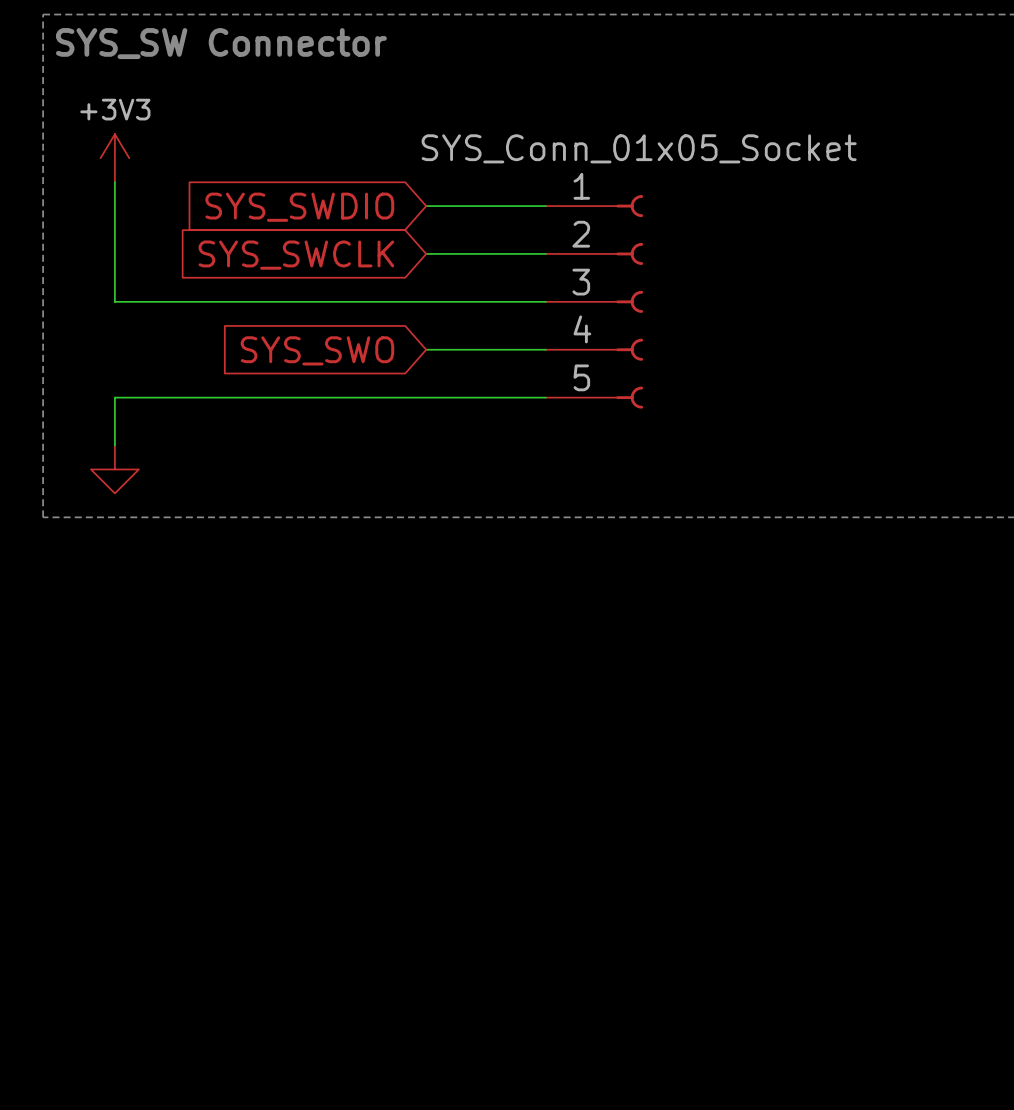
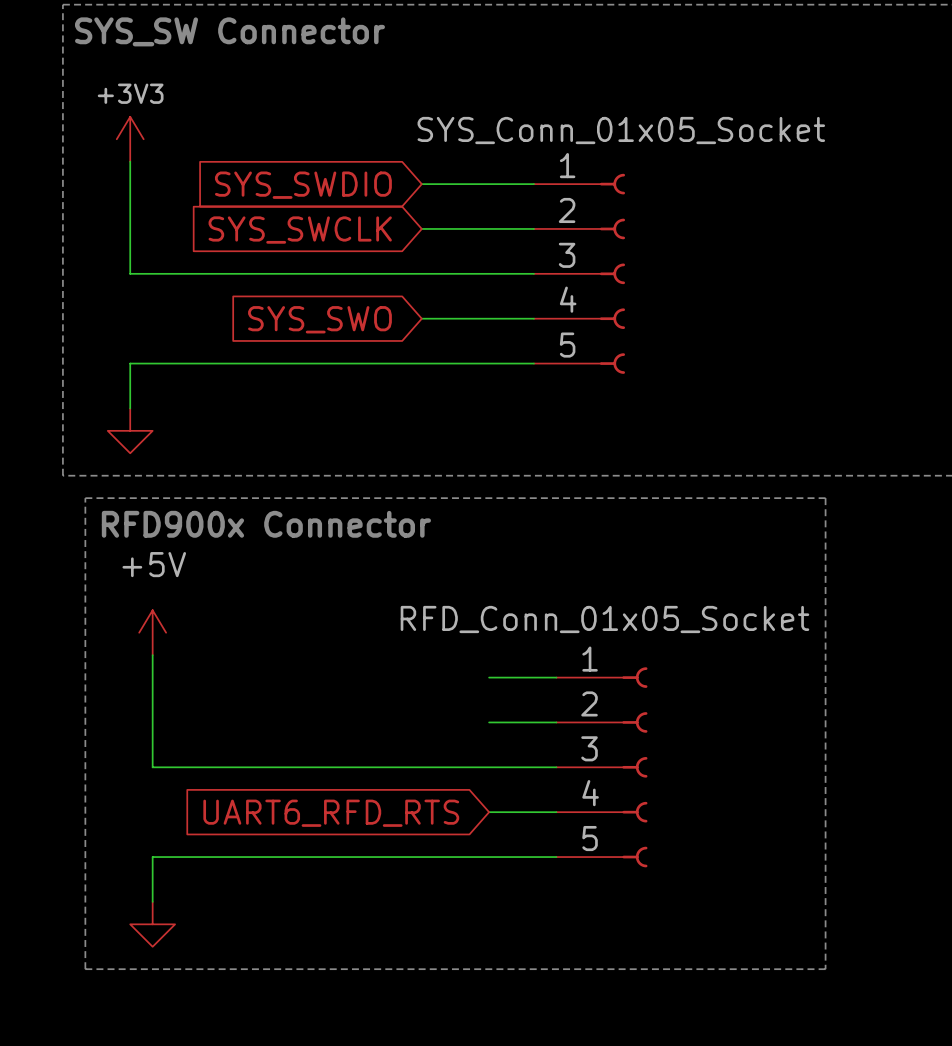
line: none -> (85, 498) (825, 498) (825, 969) (85, 969) (85, 498)
text: none -> RFD900x Connector (266, 524)
power symbol: none -> +5V (152, 632)
wire: none -> (152, 655) (152, 767) (556, 767)
wire: none -> (489, 677) (556, 677)
wire: none -> (489, 722) (556, 722)
part: none -> RFD_Conn_01x05_Socket (601, 767)
wire: none -> (489, 812) (556, 812)
global label: none -> UART6_RFD_RTS (331, 813)
wire: none -> (556, 857) (152, 857) (152, 901)
power symbol: none -> (152, 924)

